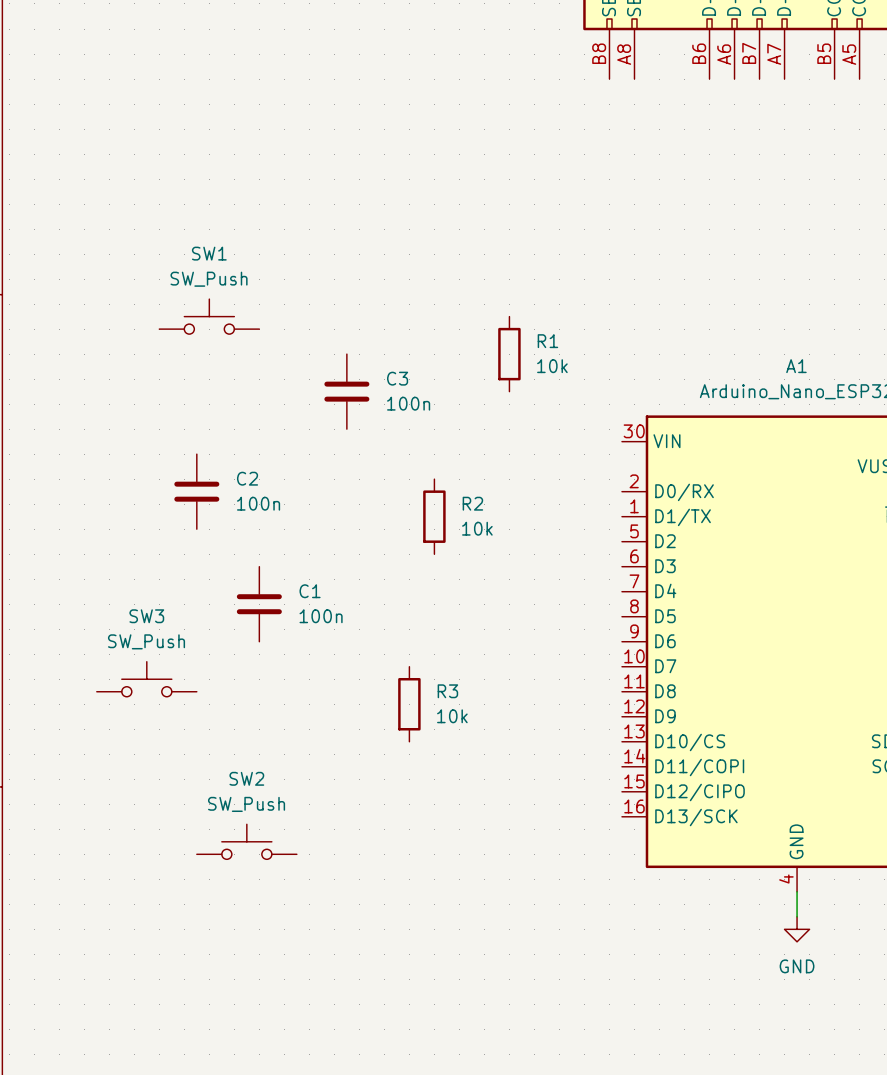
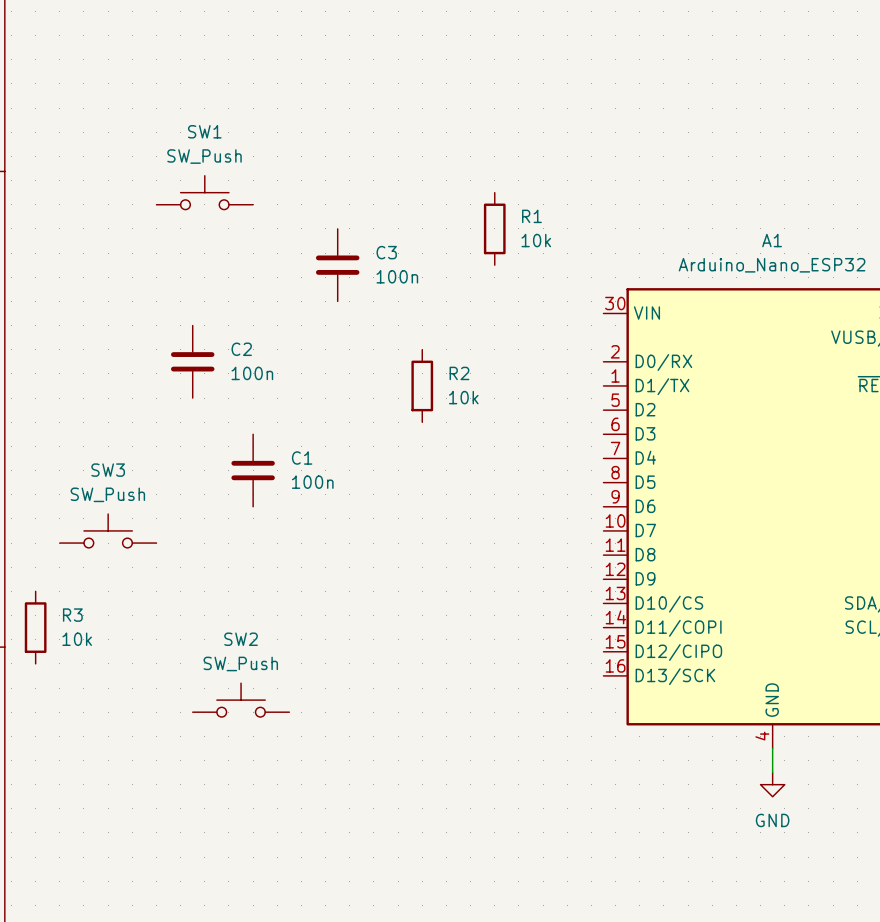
SW3 position: (146, 679) -> (108, 530)
R3 position: (409, 704) -> (35, 627)

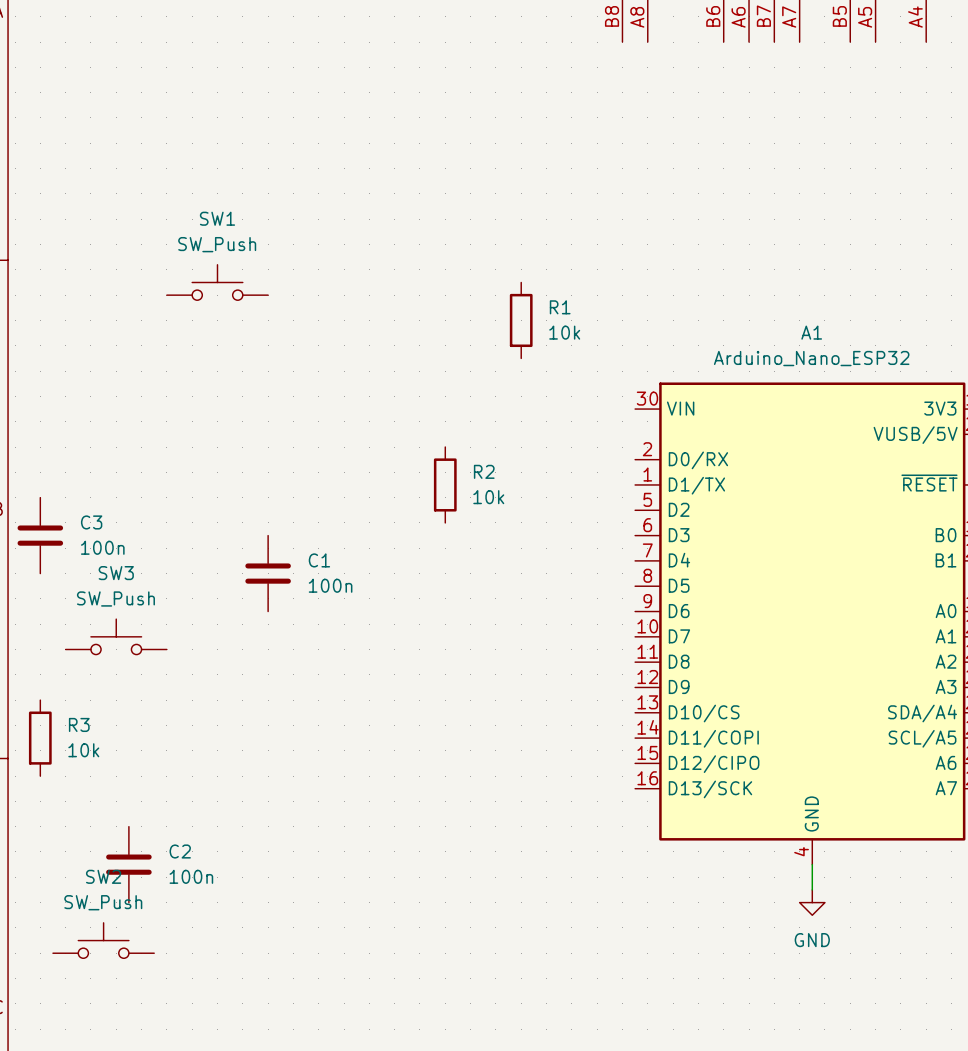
C3 position: (337, 265) -> (40, 535)
C2 position: (192, 361) -> (128, 864)
SW2 position: (241, 700) -> (103, 940)

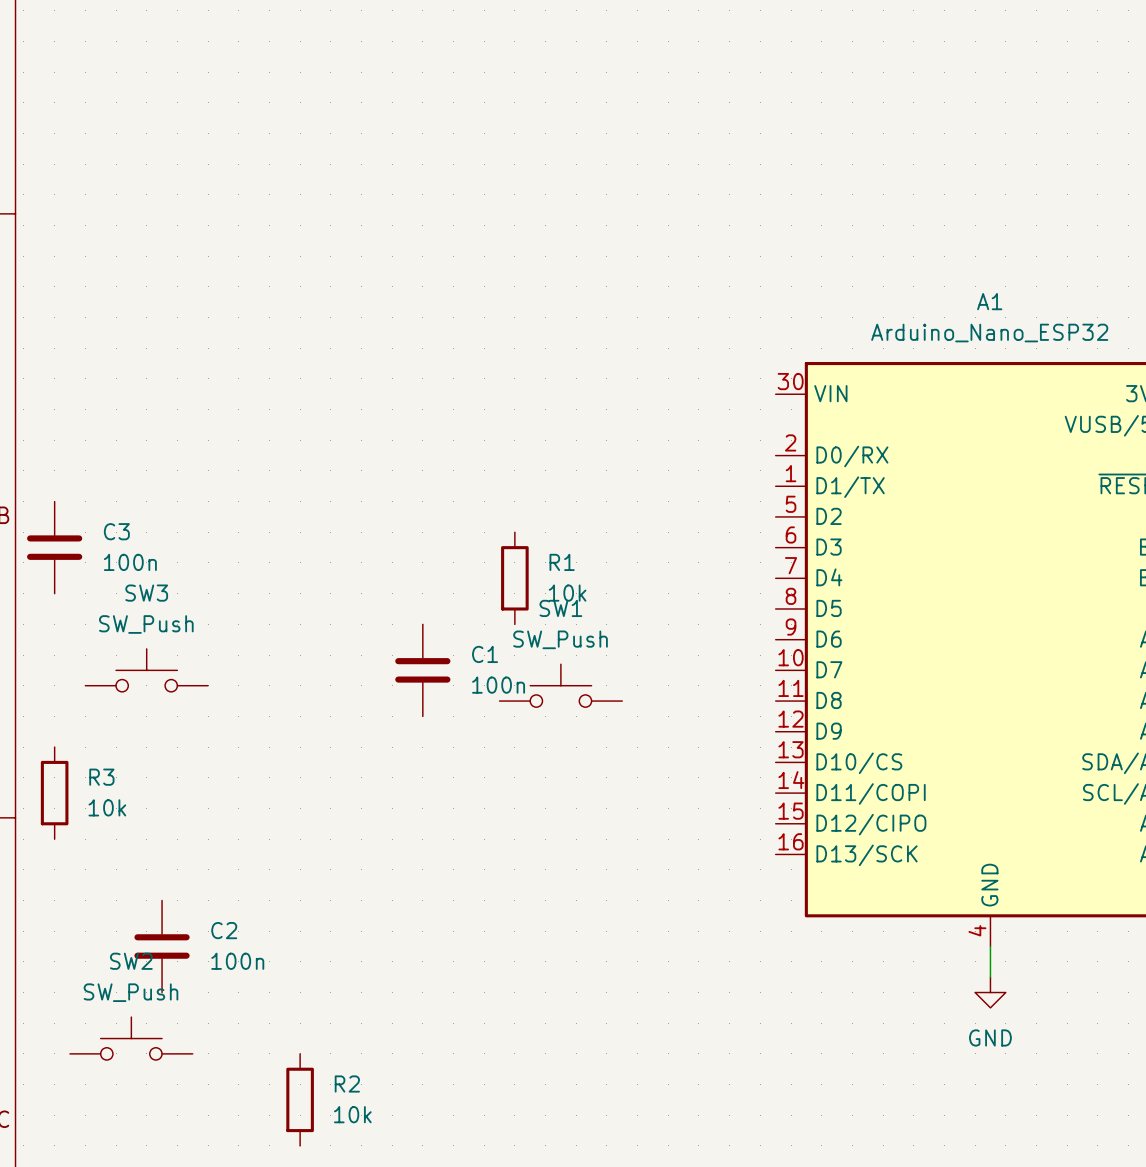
SW1 position: (217, 282) -> (560, 685)
R1 position: (521, 320) -> (514, 578)
R2 position: (445, 484) -> (300, 1099)
C1 position: (268, 573) -> (422, 670)

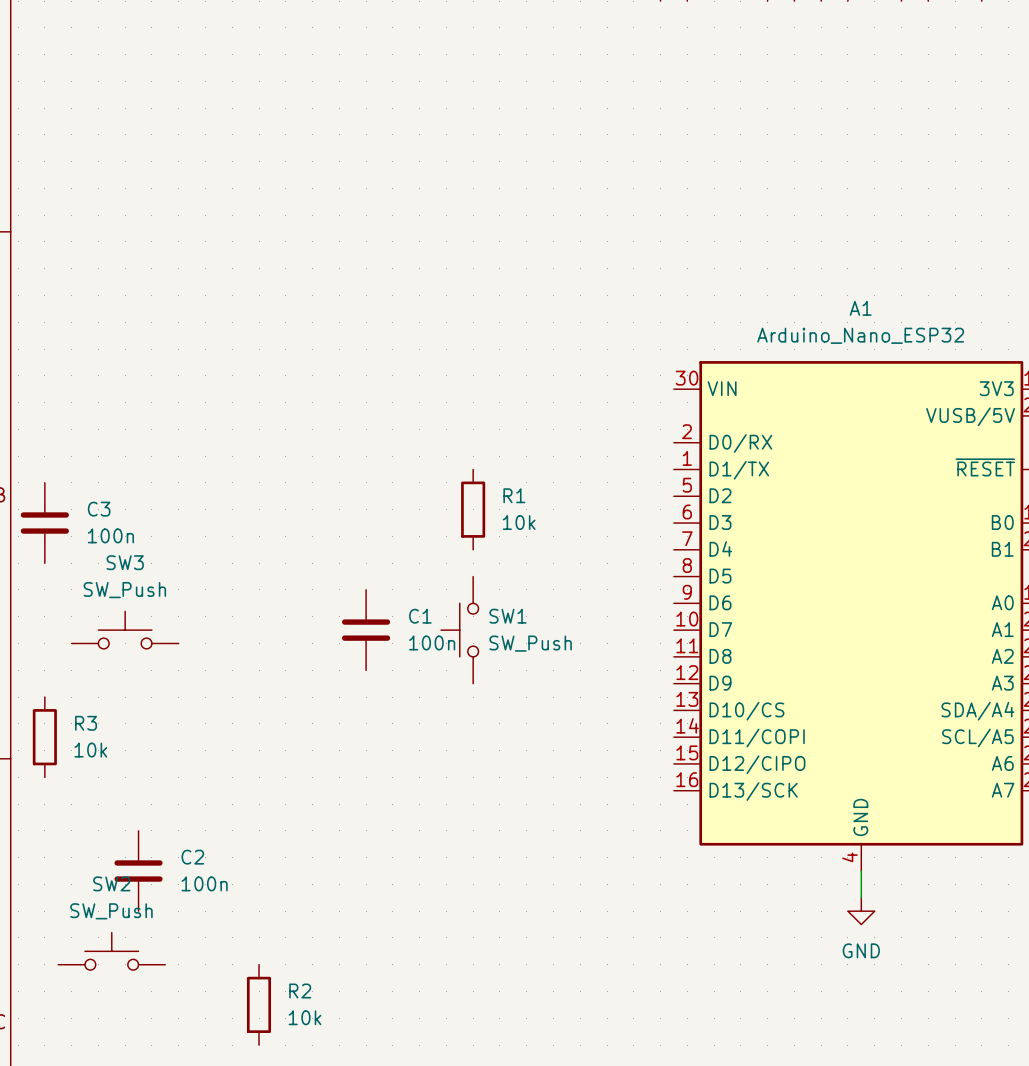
R1 position: (514, 578) -> (473, 509)
SW1 name position: SW1 (560, 608) -> SW1 (507, 616)
SW1 value position: SW_Push (560, 639) -> SW_Push (530, 643)
SW1 rotation: 0° (560, 685) -> 90° counterclockwise (459, 630)

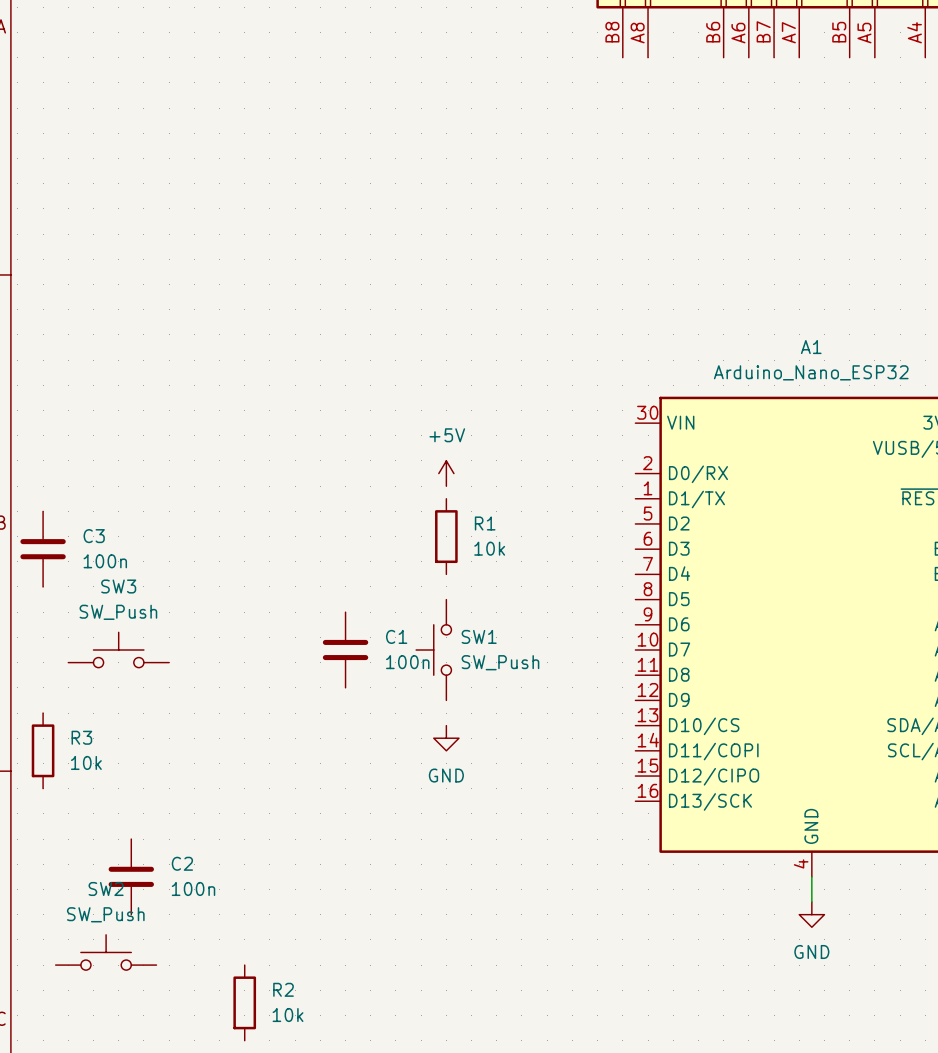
power symbol: none -> +5V (446, 473)
power symbol: none -> GND (446, 738)

